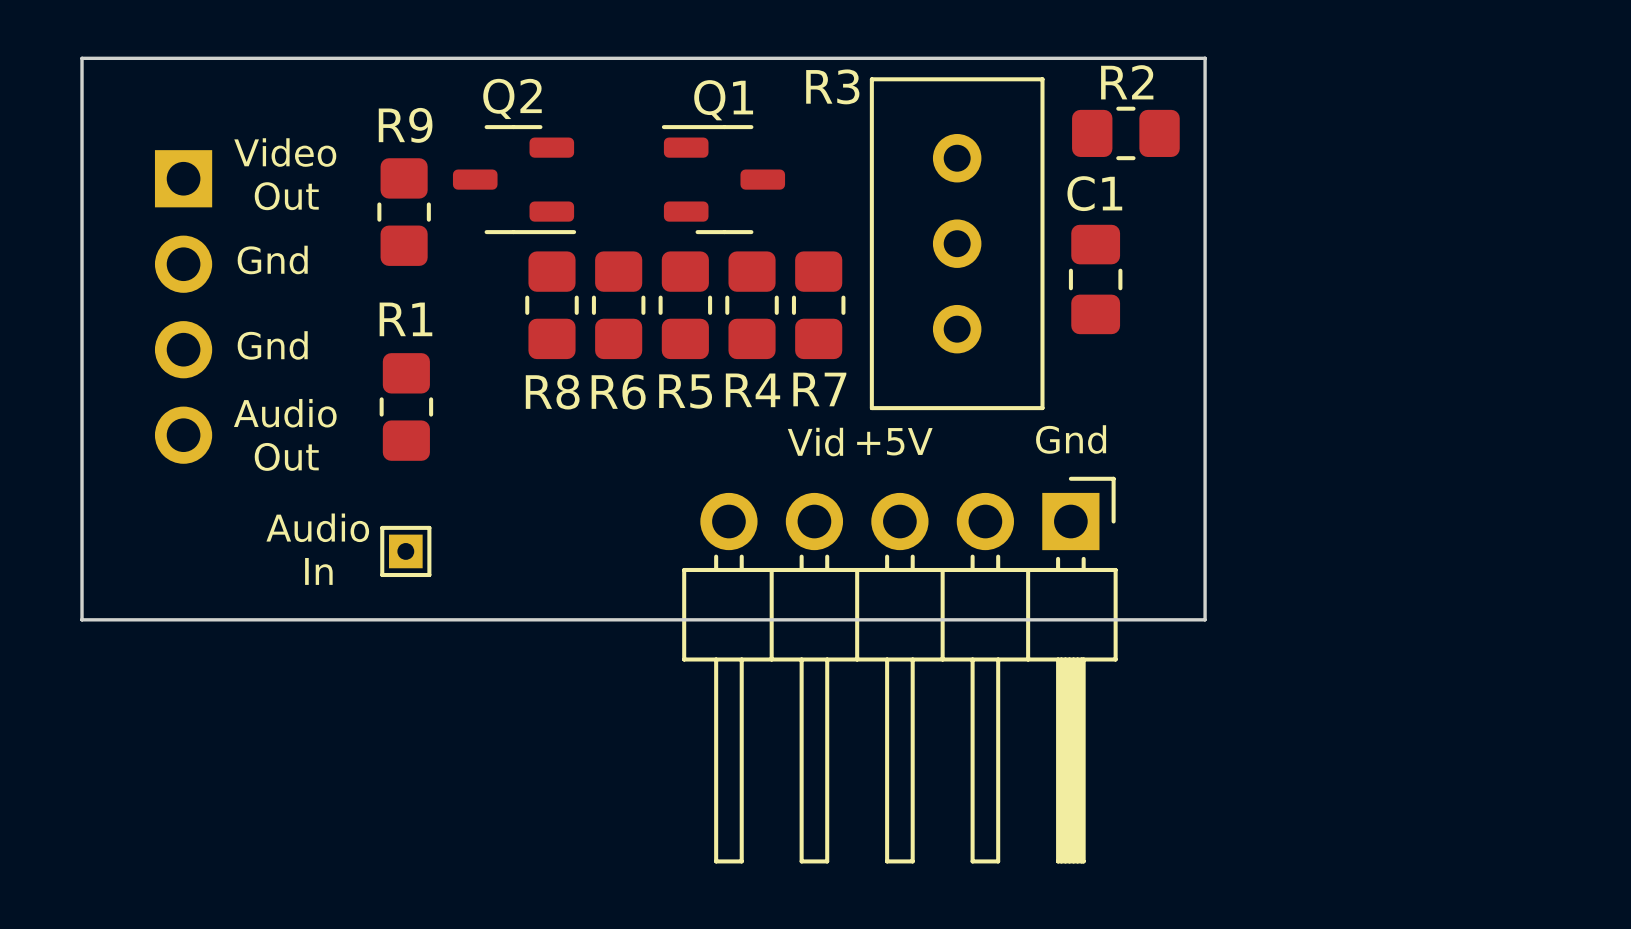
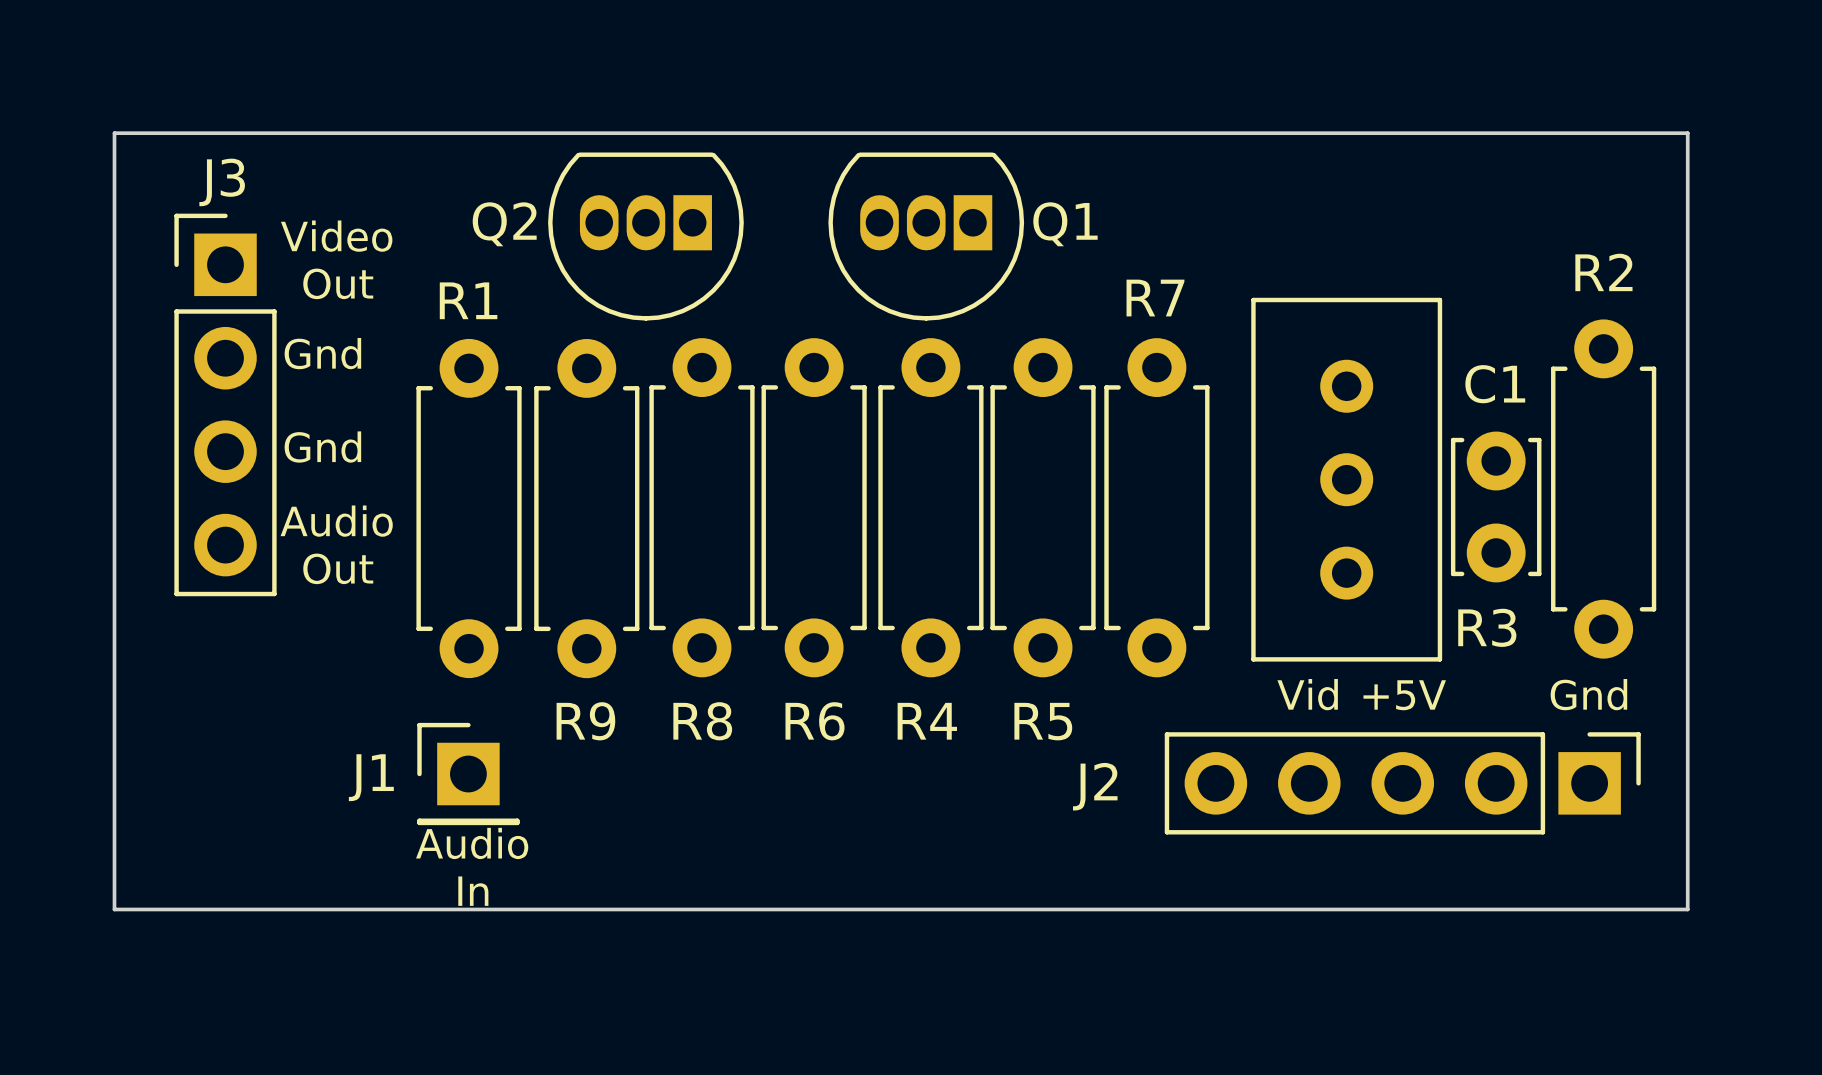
board edge: (1205, 58) (1205, 619) -> none
R2 name position: R2 (1127, 82) -> R2 (1603, 272)
R3 name position: R3 (832, 86) -> R3 (1487, 627)
Q2 name position: Q2 (512, 98) -> Q2 (504, 224)
Q1 name position: Q1 (723, 100) -> Q1 (1065, 224)
R2 footprint: [1072, 106, 1180, 161] -> [1551, 319, 1657, 659]
R9 name position: R9 (405, 125) -> R9 (585, 721)
Q2 footprint: [452, 125, 577, 235] -> [548, 152, 744, 321]
Q1 footprint: [661, 125, 786, 235] -> [828, 152, 1025, 321]
R9 footprint: [377, 158, 431, 266] -> [534, 339, 640, 679]
C1 footprint: [1068, 224, 1123, 335] -> [1450, 431, 1542, 583]
R3 position: (957, 243) -> (1346, 479)
R8 footprint: [525, 251, 579, 360] -> [649, 338, 755, 678]
R6 footprint: [591, 251, 646, 360] -> [761, 338, 867, 678]
R5 footprint: [658, 251, 713, 360] -> [878, 338, 984, 678]
R4 footprint: [725, 251, 779, 360] -> [990, 338, 1096, 678]
R7 footprint: [791, 251, 846, 360] -> [1104, 338, 1210, 678]
J3 side: bottom (183, 306) -> top (225, 404)
R1 name position: R1 (405, 319) -> R1 (468, 300)
R1 footprint: [379, 353, 434, 461] -> [416, 338, 522, 679]
R7 name position: R7 (819, 389) -> R7 (1155, 298)
R4 name position: R4 (752, 390) -> R4 (927, 721)
R5 name position: R5 (685, 391) -> R5 (1043, 721)
R8 name position: R8 (552, 392) -> R8 (702, 721)
R6 name position: R6 (618, 392) -> R6 (815, 721)
text position: Gnd (1071, 439) -> Gnd (1588, 694)
text position: +5V (894, 441) -> +5V (1404, 695)
text position: Vid (815, 442) -> Vid (1307, 694)
text position: Audio (317, 527) -> Audio (472, 843)
part: (405, 551) -> none
text position: In (318, 571) -> In (473, 891)
board edge: (81, 619) (1204, 619) -> (114, 746) (114, 909) (1687, 909) (1687, 133) (1342, 133)
J1: none -> (468, 774)
J2: none -> (1402, 783)
part: (899, 670) -> none

